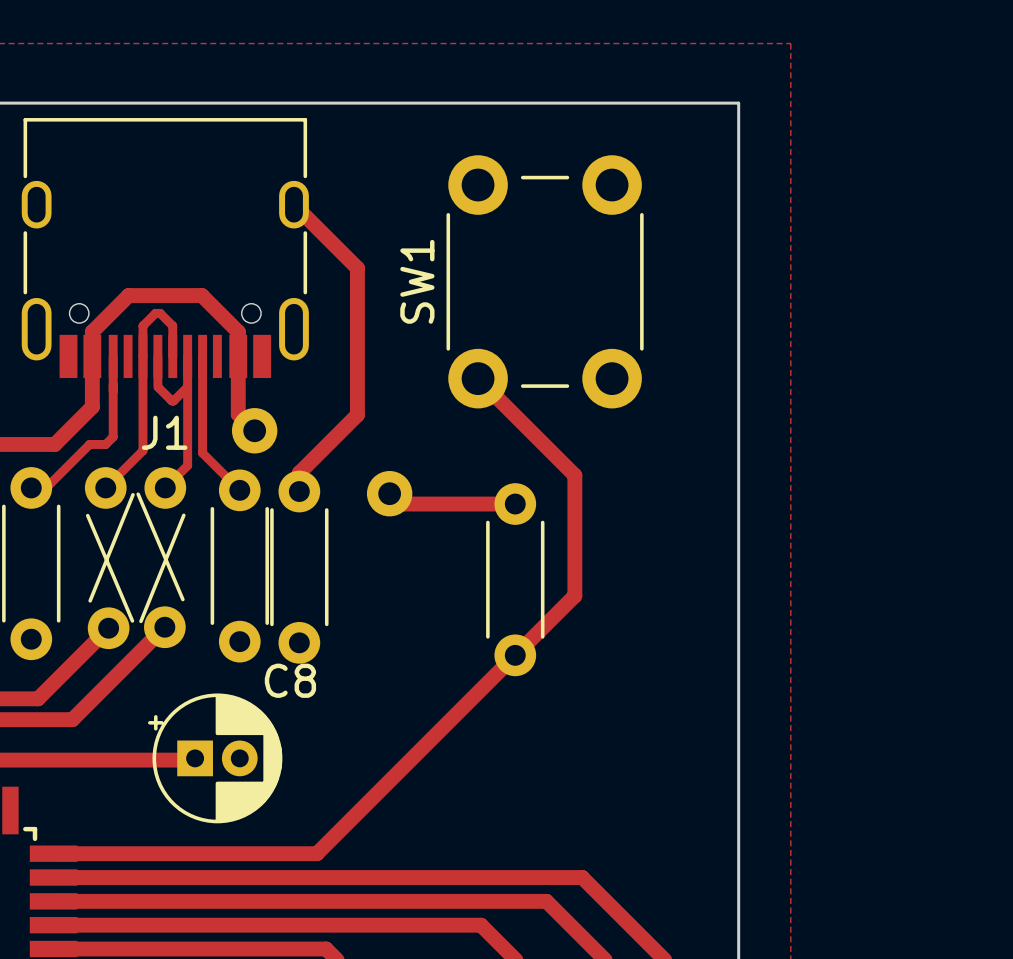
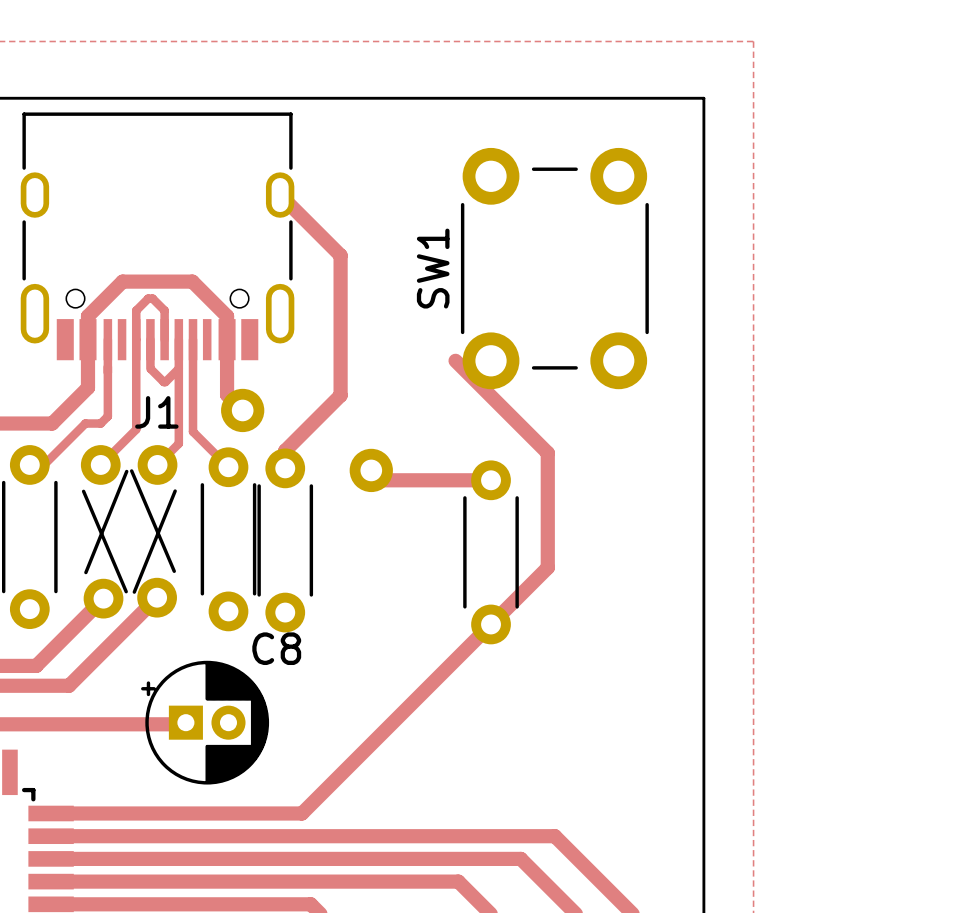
SW1 position: (545, 281) -> (554, 268)

